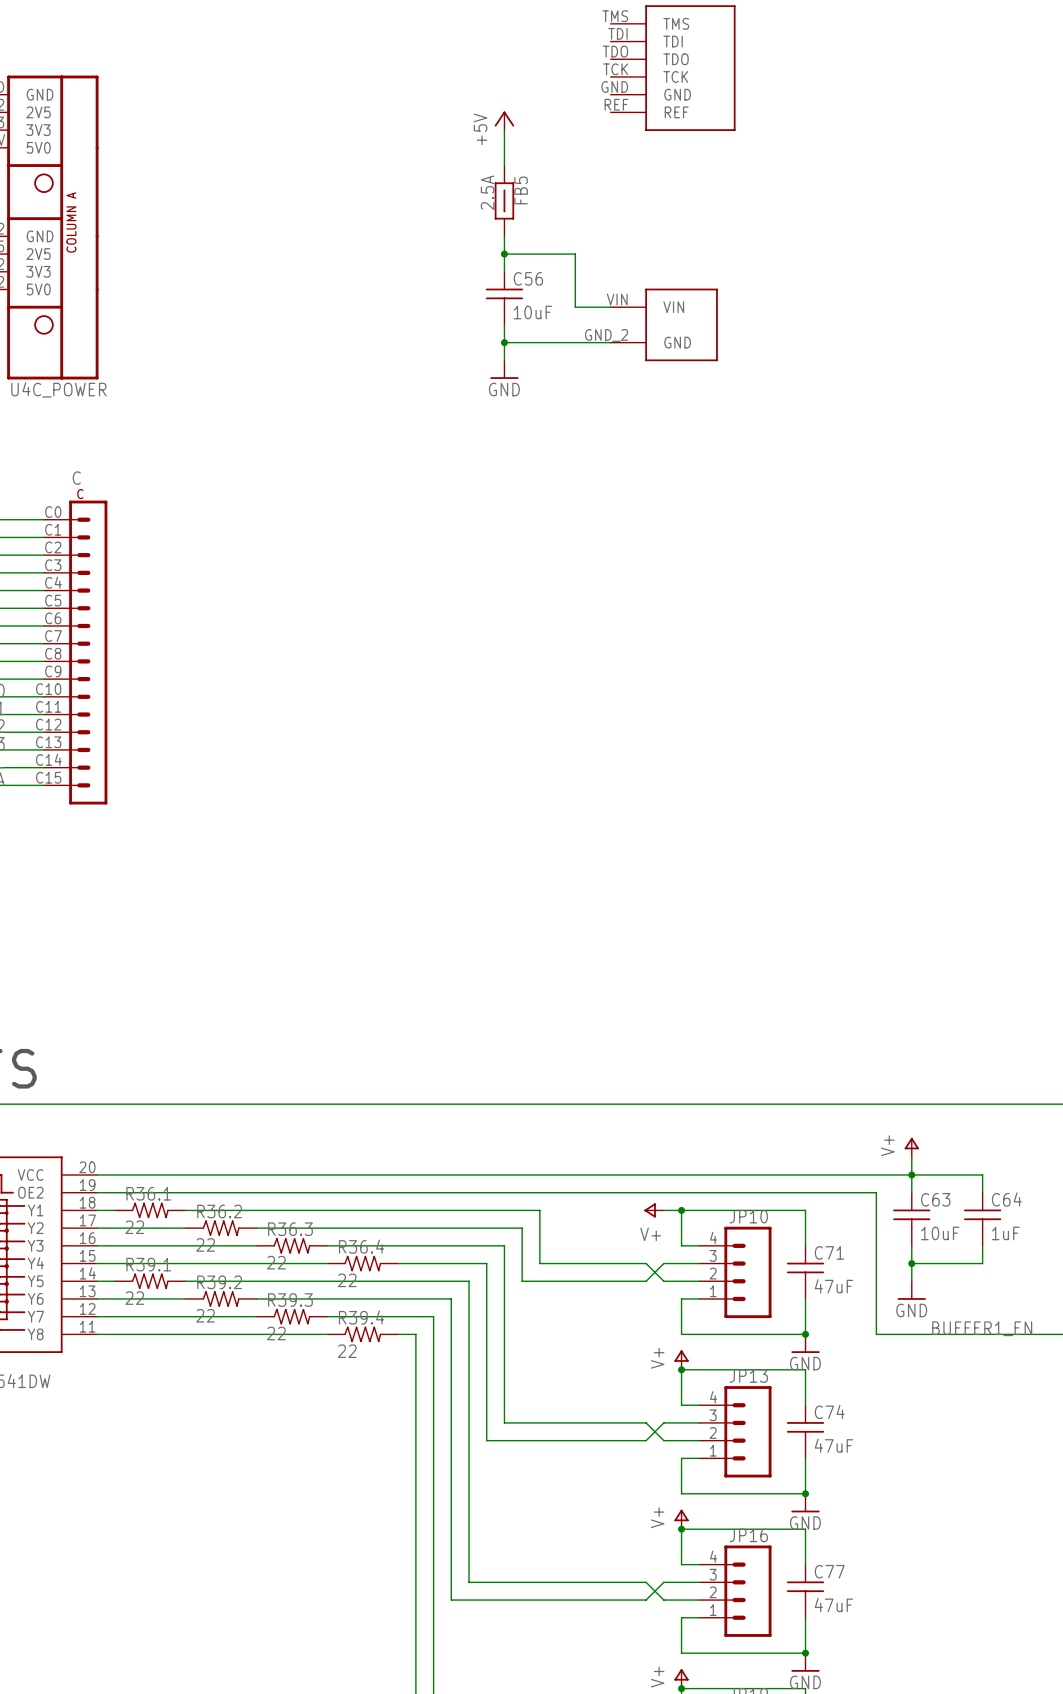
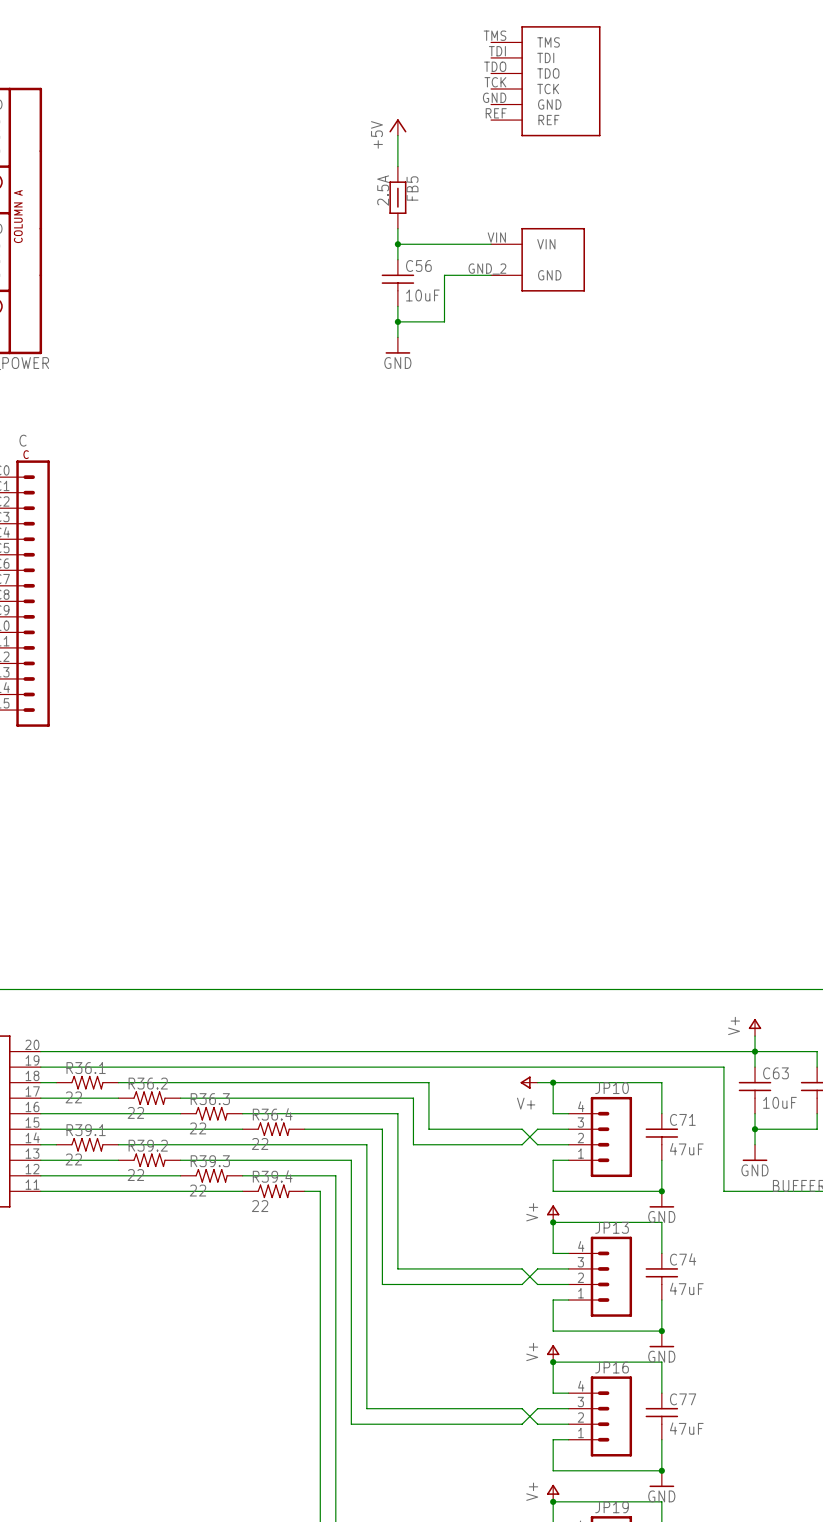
wire: (575, 254) (575, 307) (610, 307) -> (460, 244) (491, 244)
part position: (664, 324) -> (538, 259)
wire: (557, 342) (610, 342) -> (444, 321) (444, 275) (491, 275)

